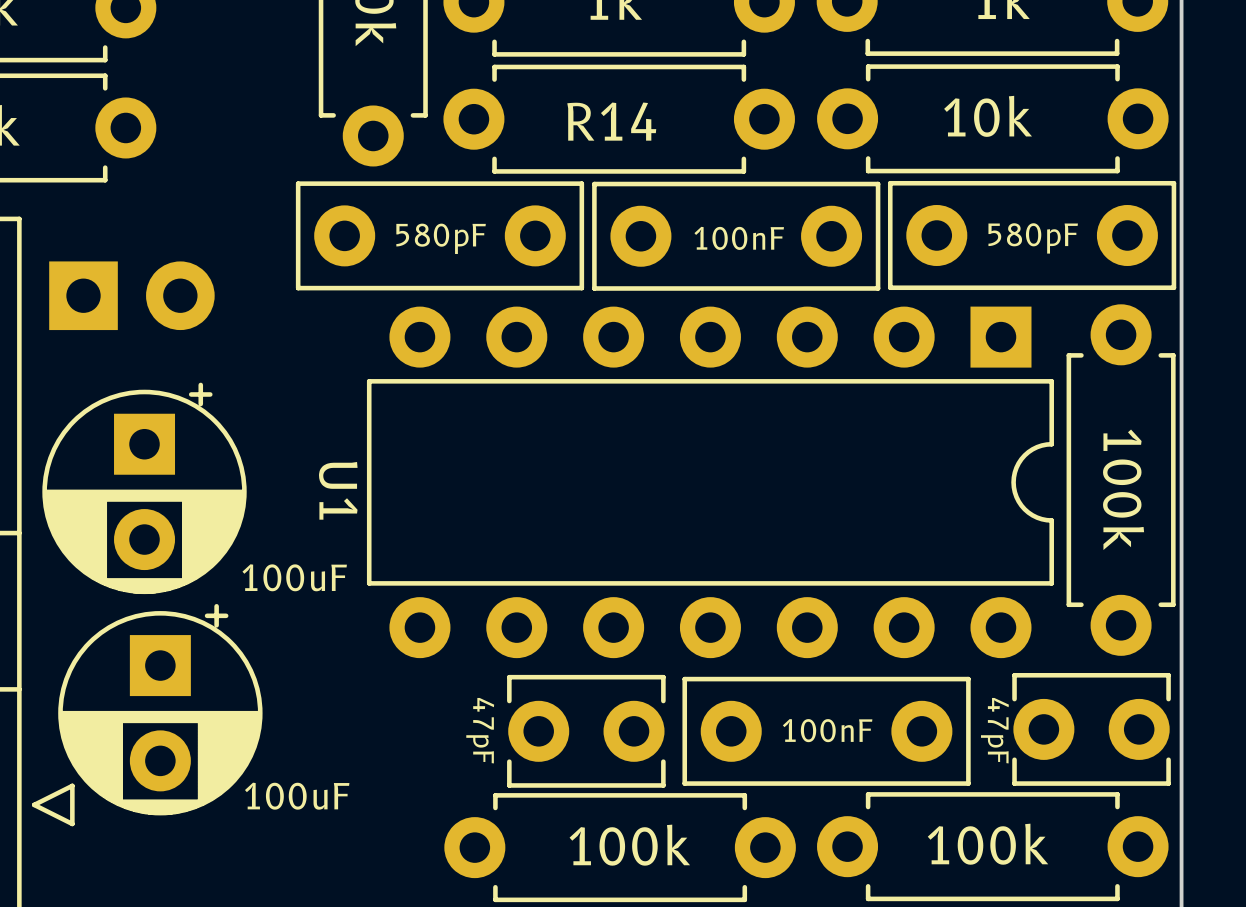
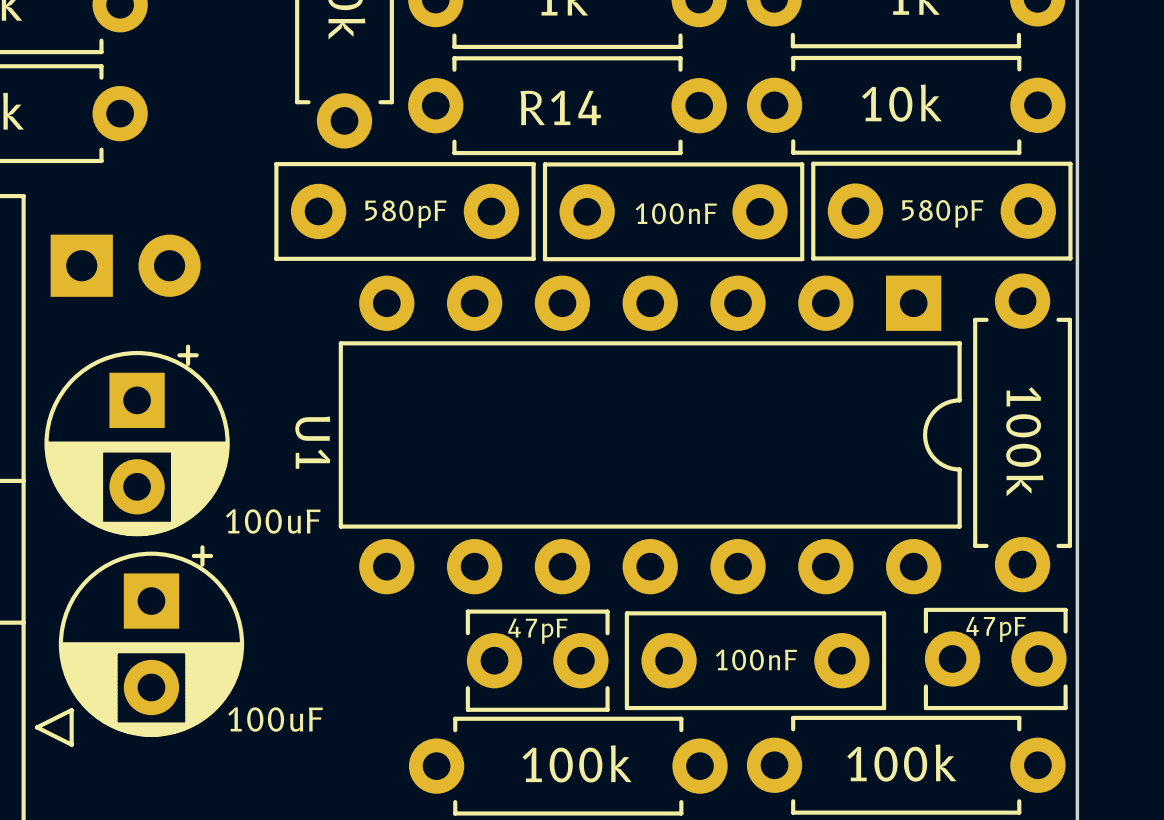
part value rotation: 0° (480, 730) -> 90° counterclockwise (537, 631)
part value position: 47pF (480, 730) -> 47pF (537, 631)
part value rotation: 0° (994, 730) -> 90° counterclockwise (996, 629)
part value position: 47pF (994, 730) -> 47pF (996, 629)

